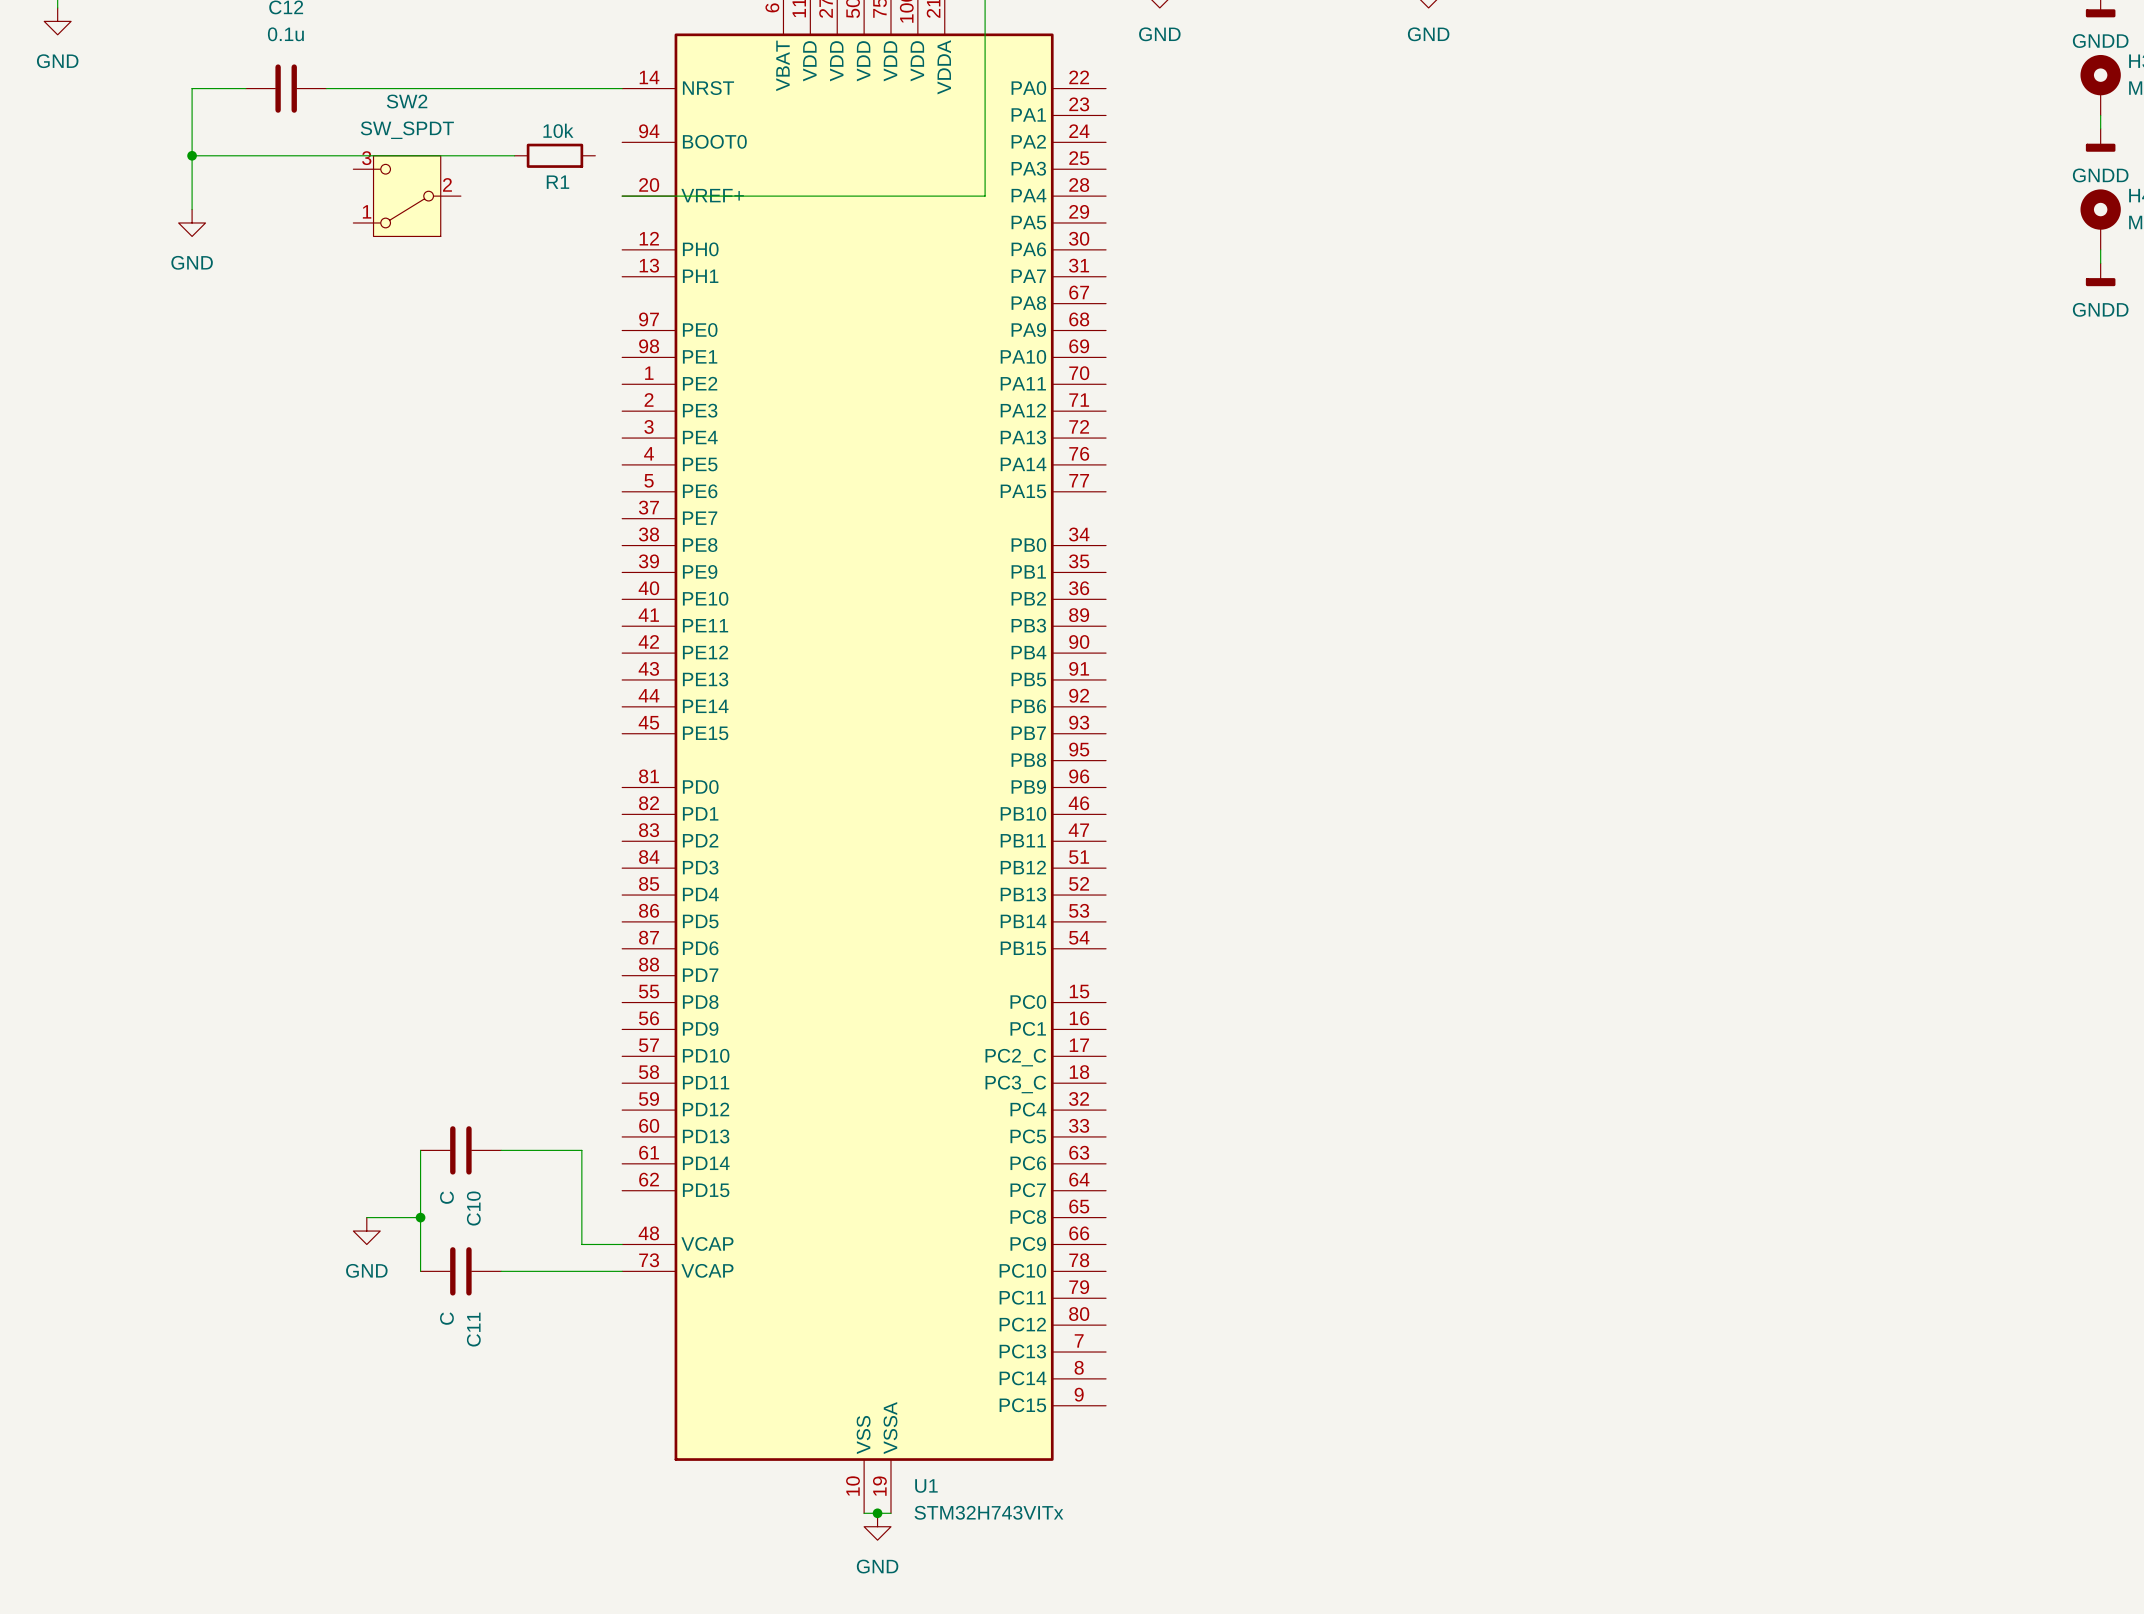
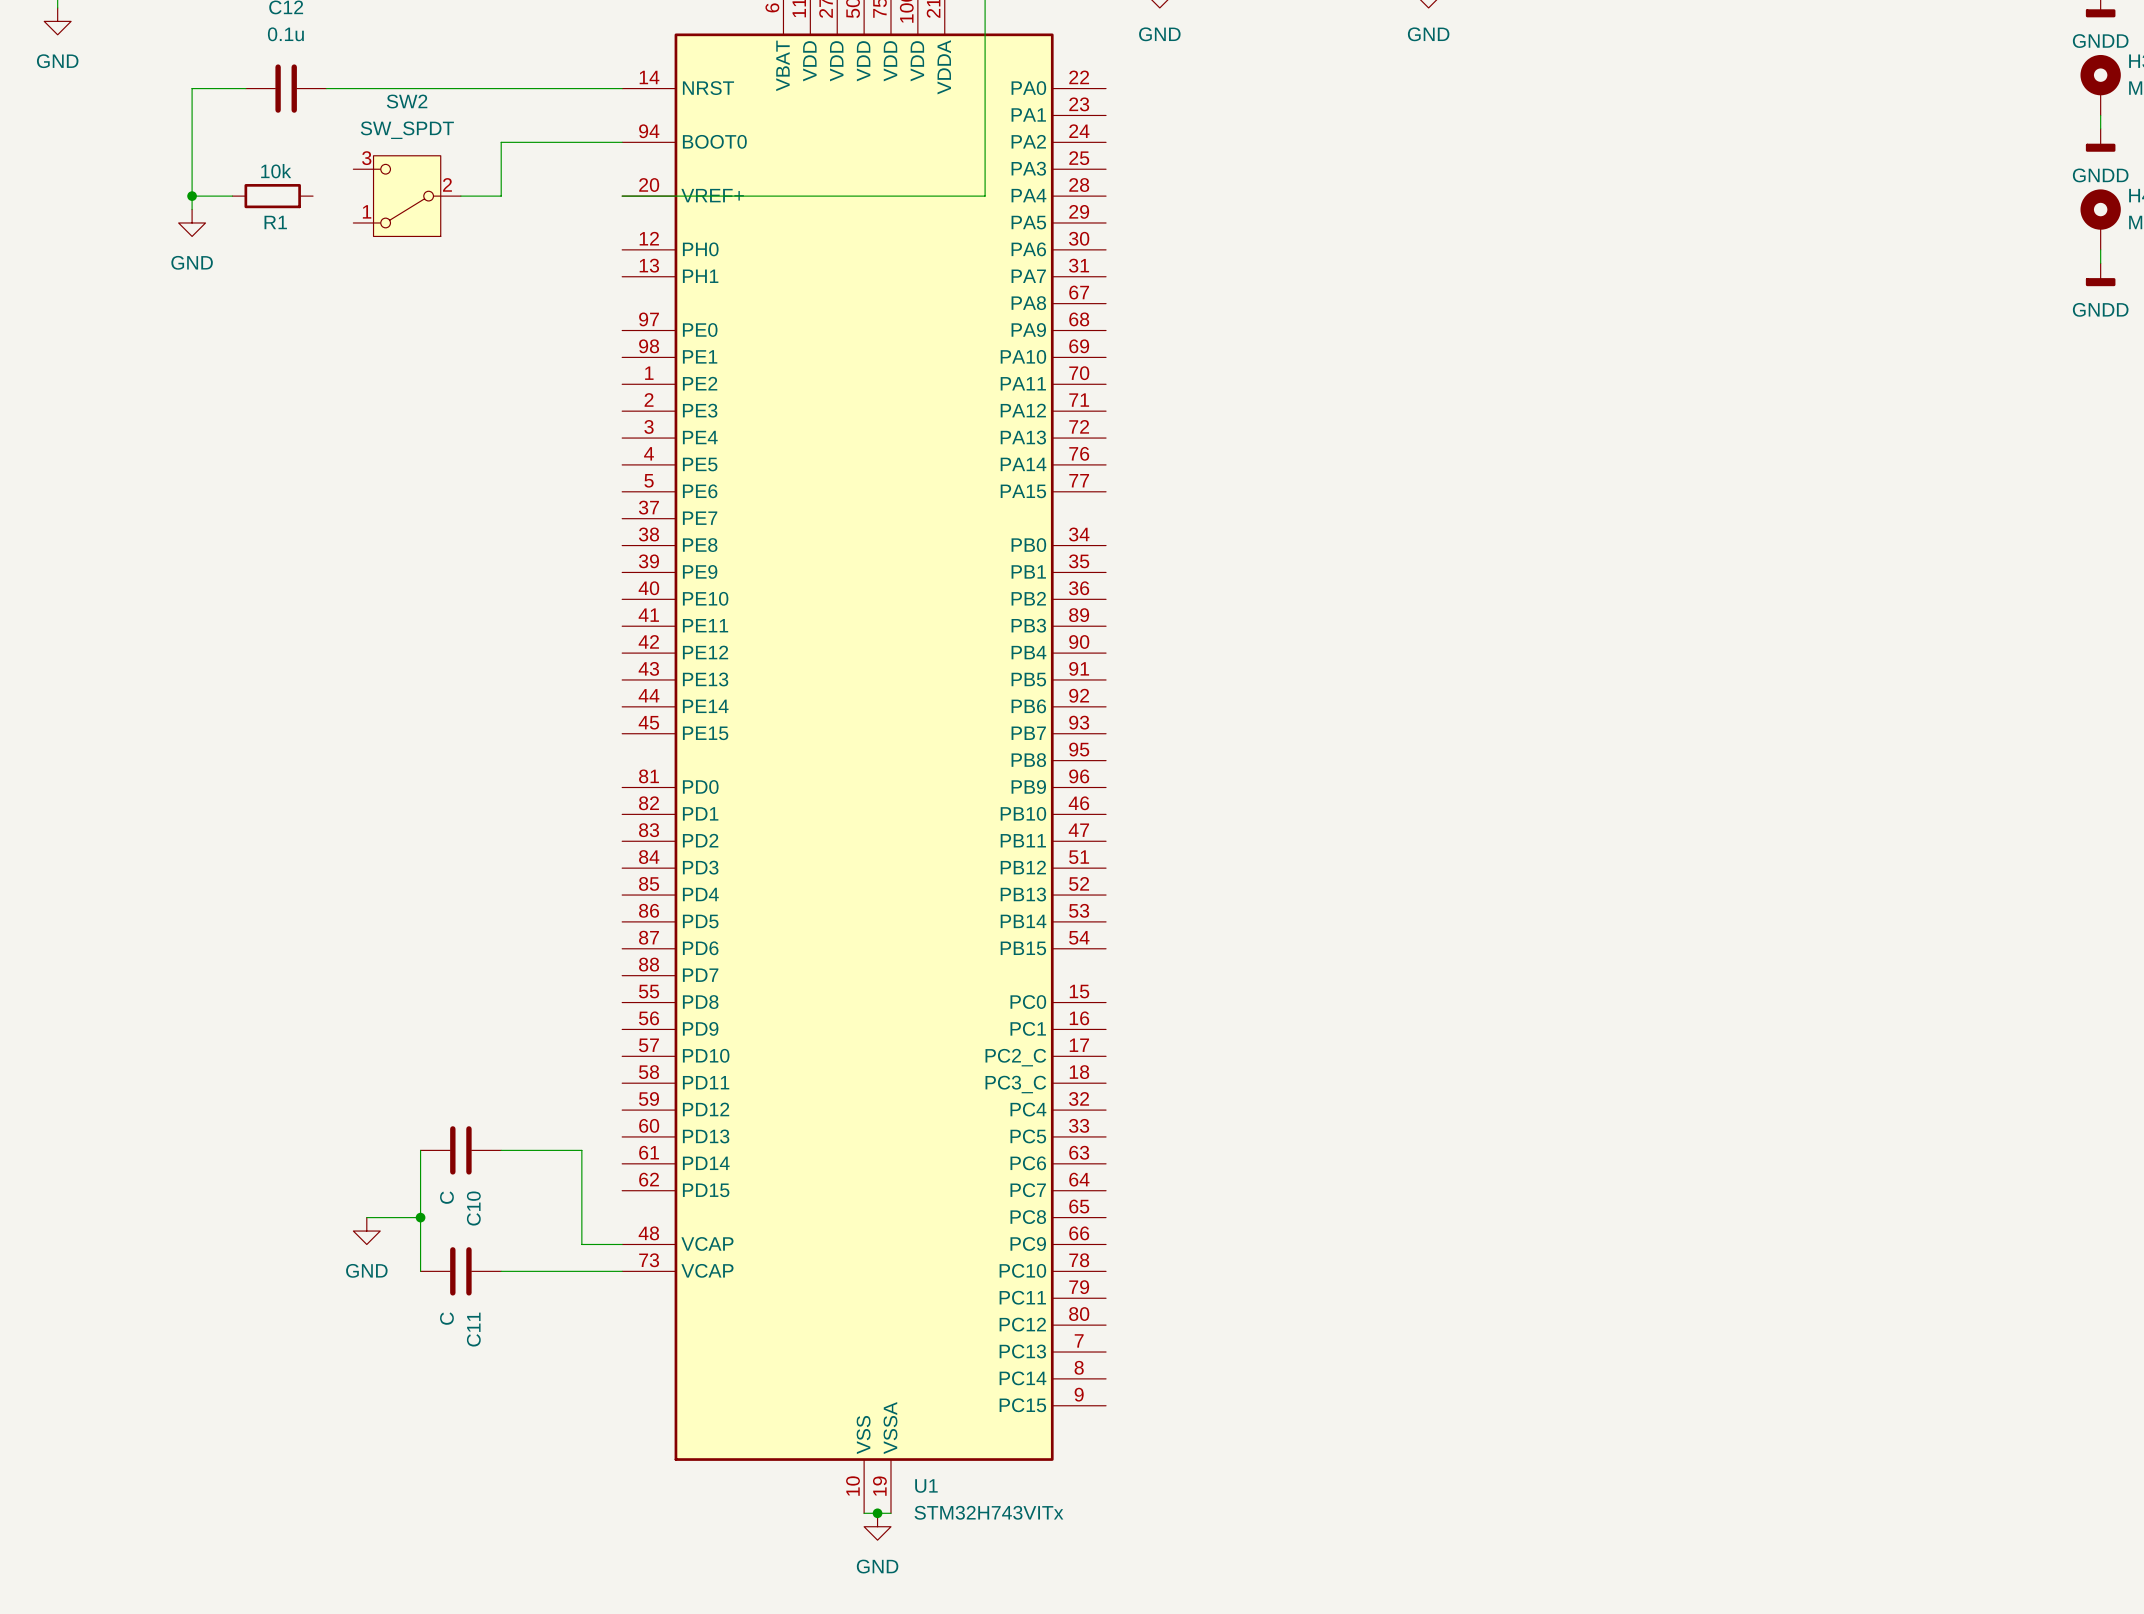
wire: none -> (622, 142) (501, 142) (501, 196) (460, 196)
wire: (192, 155) (514, 155) -> none
junction position: (192, 155) -> (192, 196)
R1 position: (554, 155) -> (272, 196)
wire: none -> (192, 196) (232, 196)

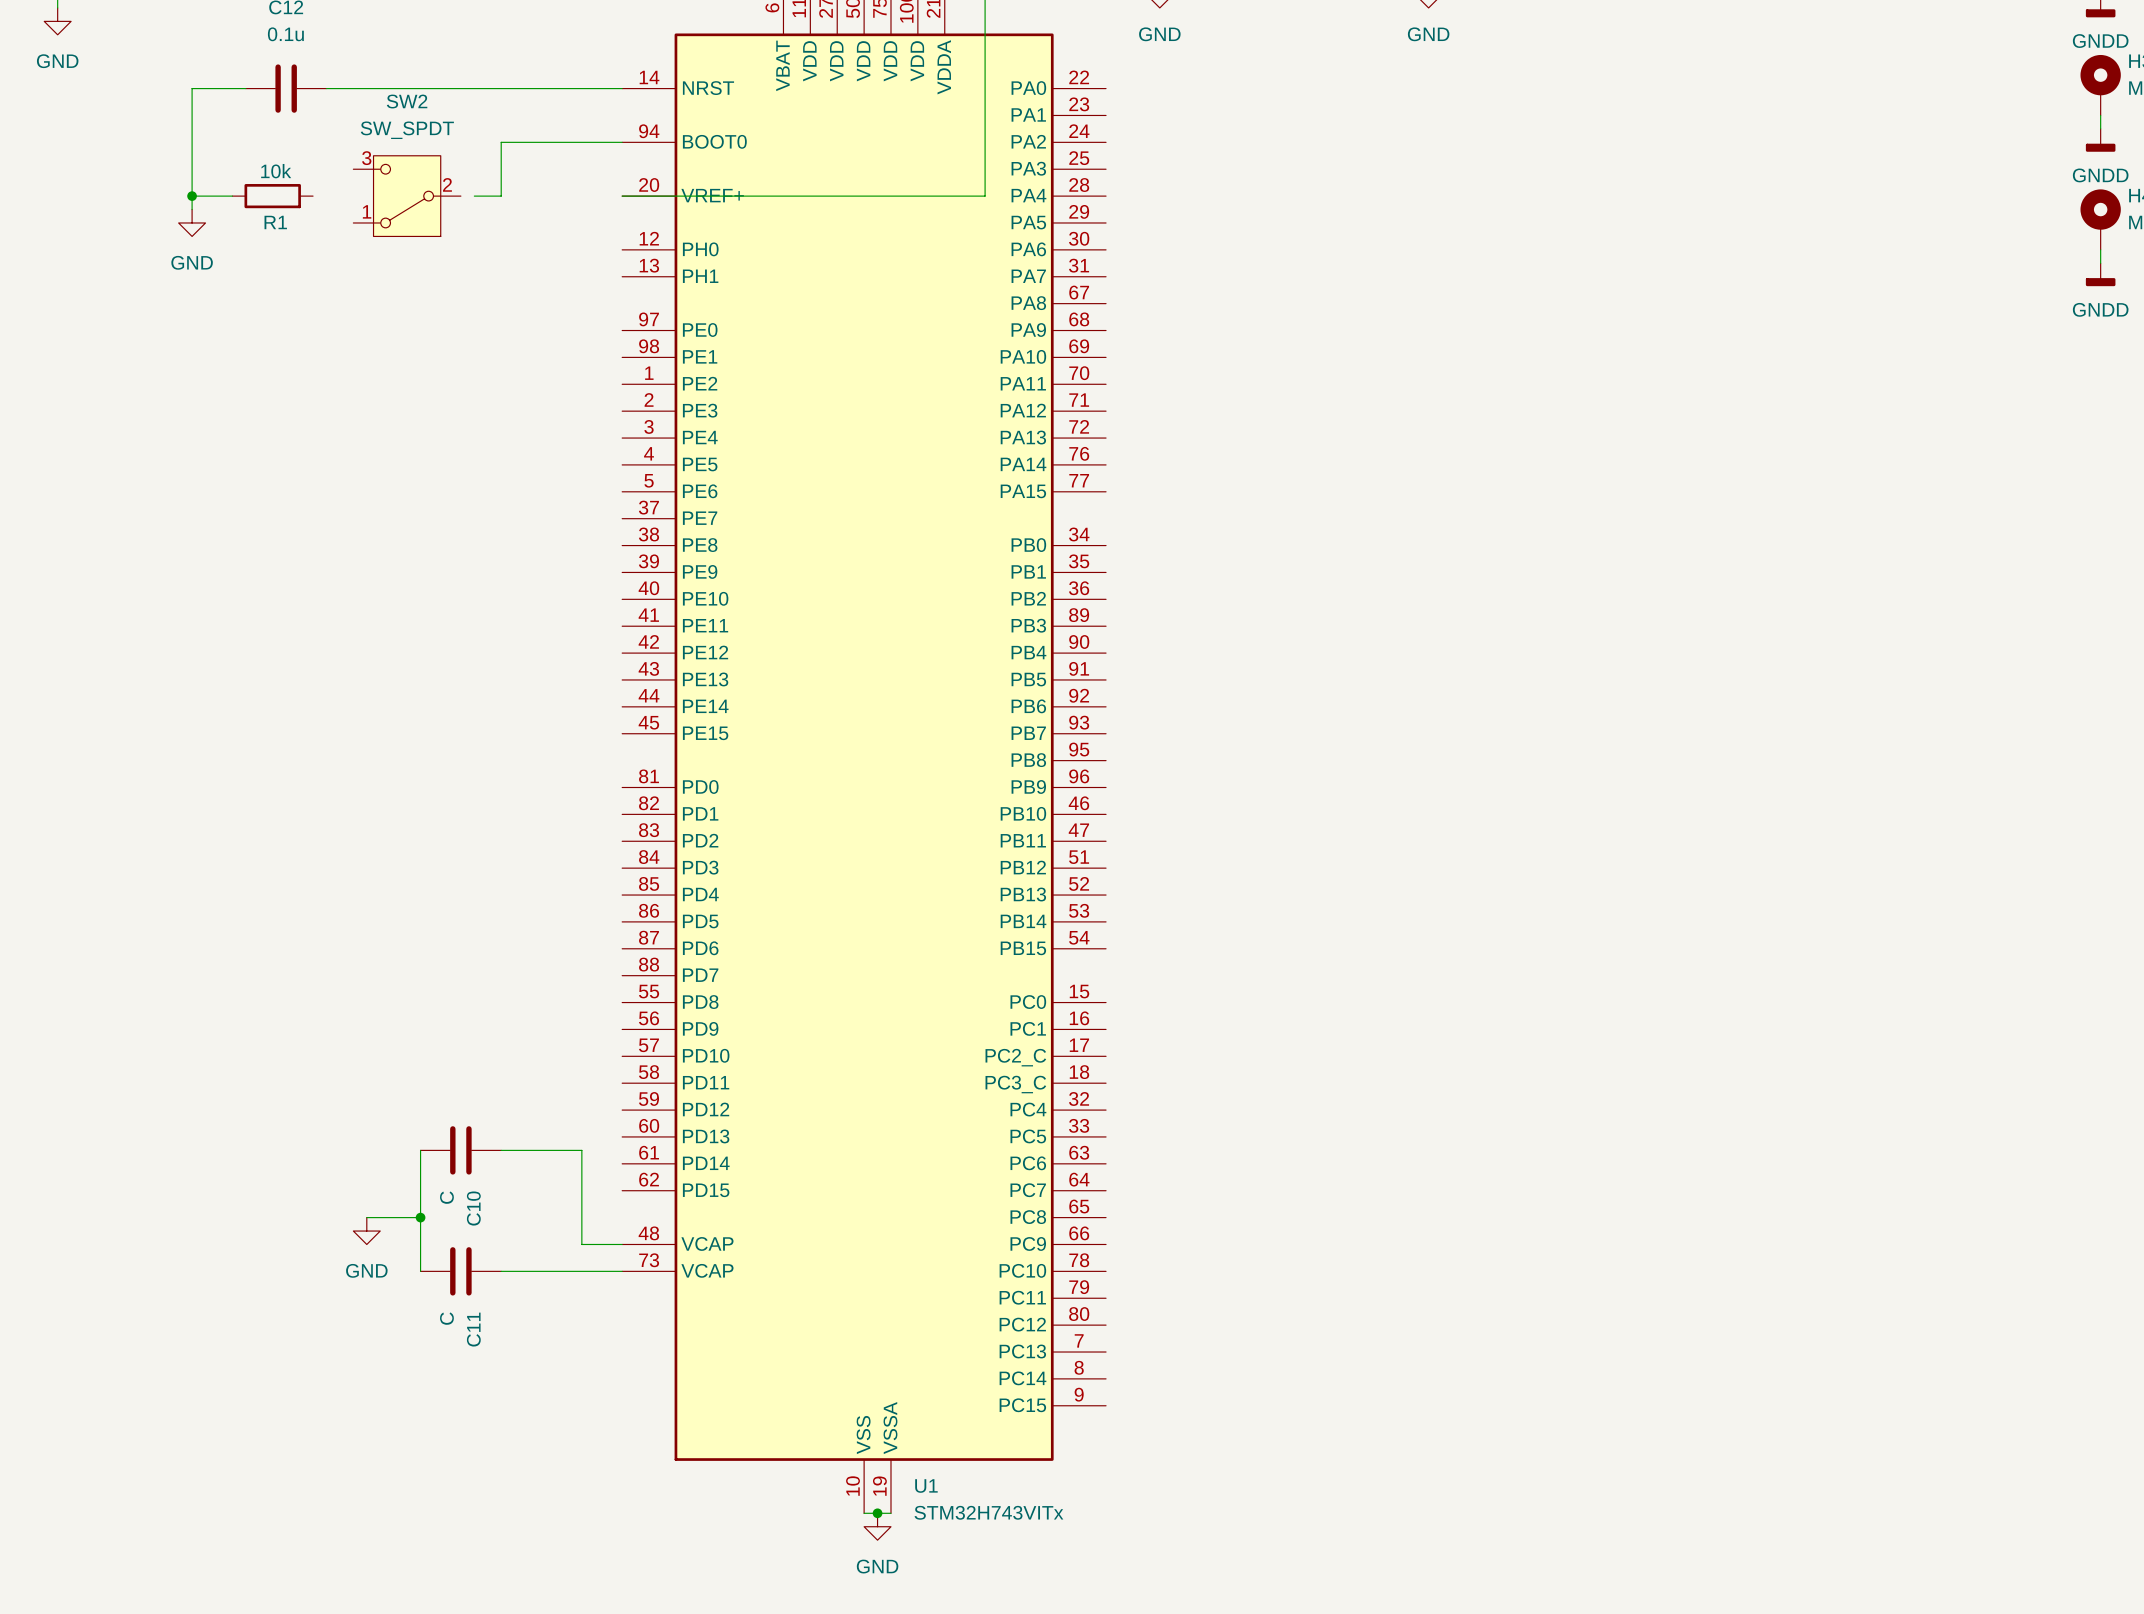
wire: (460, 196) (474, 196) -> none

